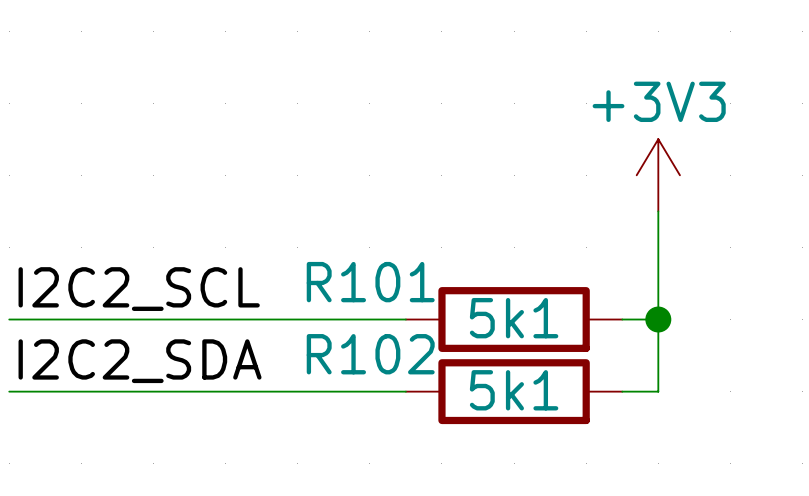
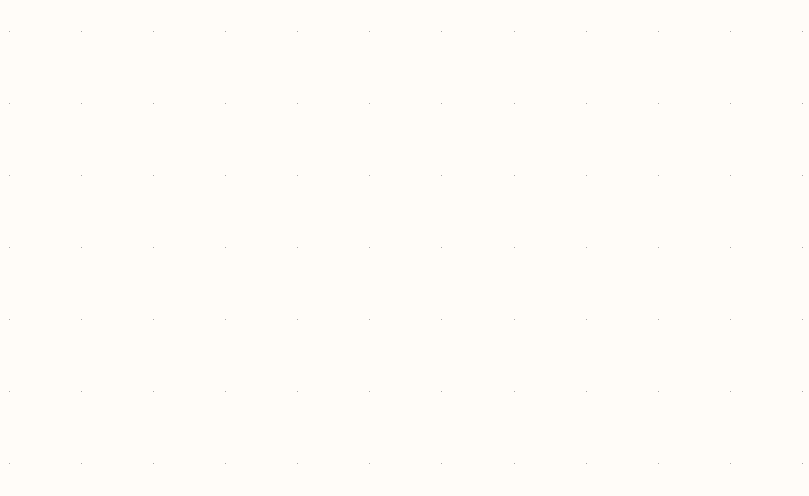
power symbol: +3V3 (658, 175) -> none
wire: (658, 211) (658, 391) (622, 391) -> none
label: I2C2_SCL (139, 289) -> none
wire: (9, 319) (405, 319) -> none
R101: 5k1 (514, 319) -> none
wire: (622, 319) (658, 319) -> none
junction: (658, 319) -> none
label: I2C2_SDA (140, 361) -> none
wire: (9, 391) (405, 391) -> none
R102: 5k1 (514, 391) -> none

